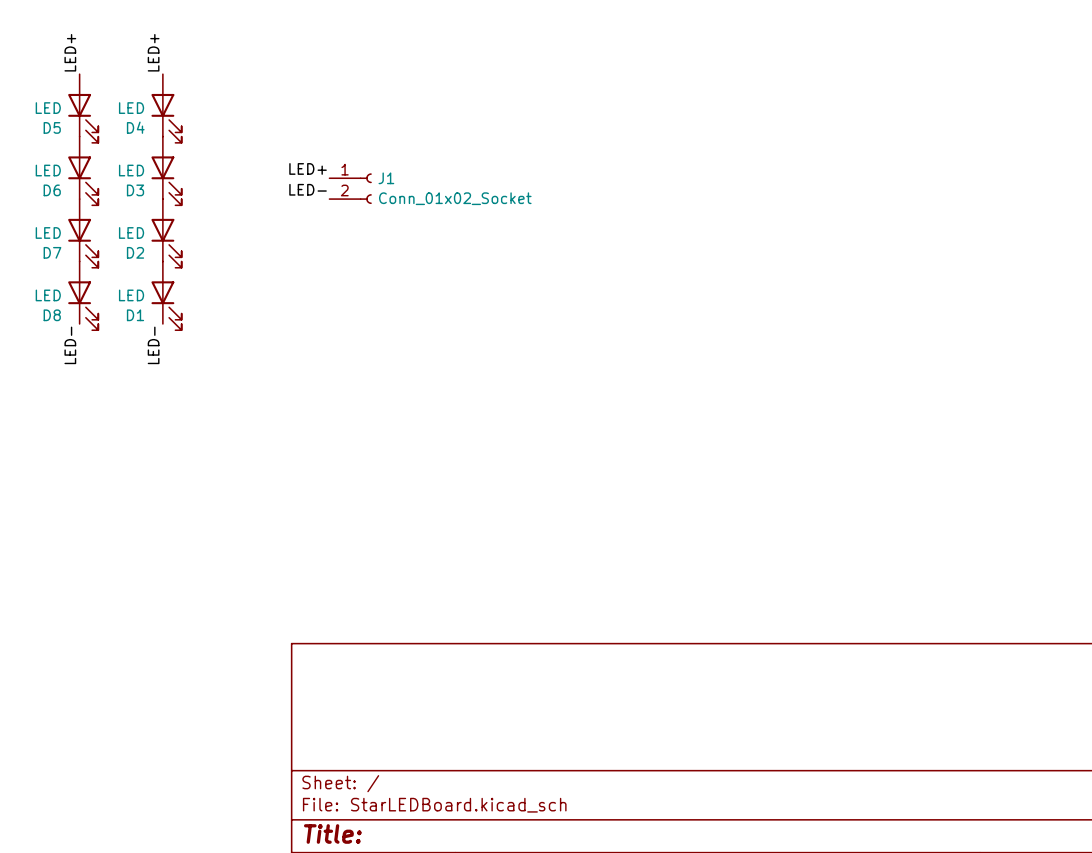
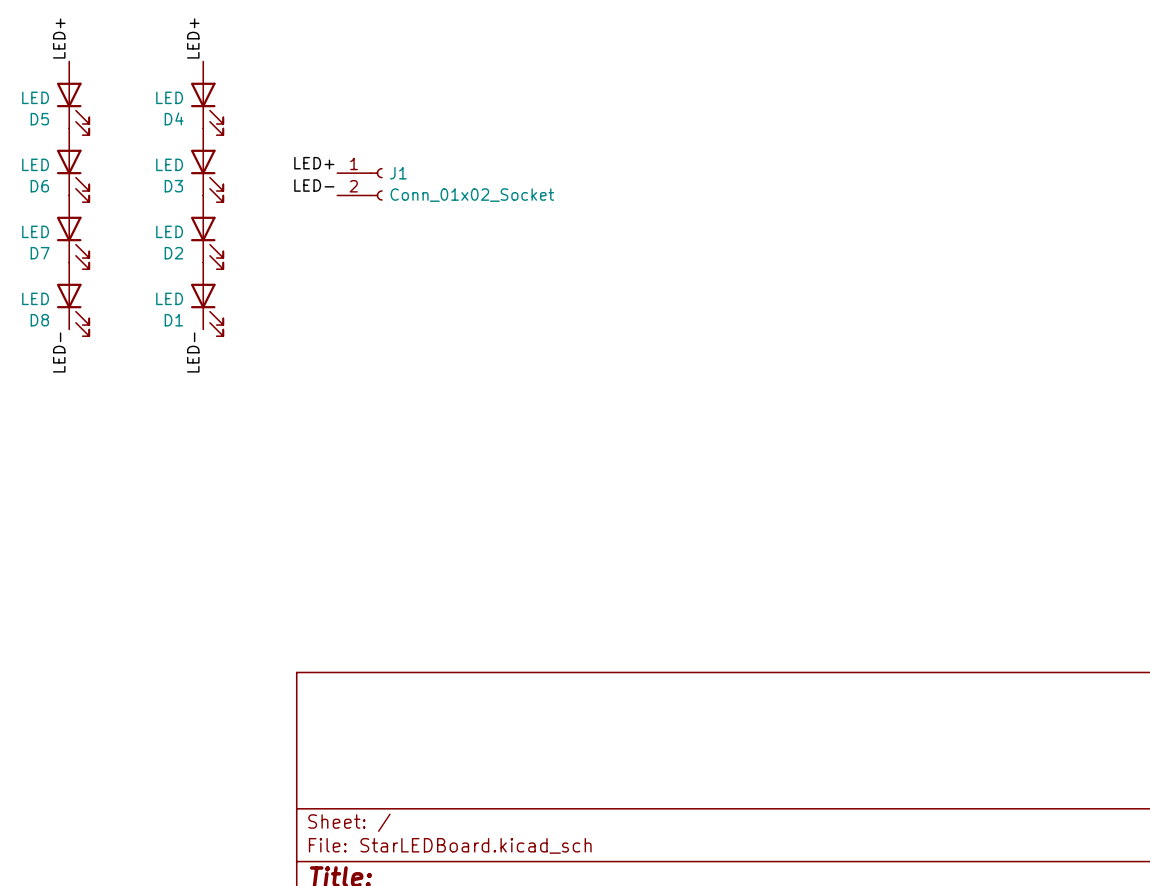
label position: LED+ (153, 52) -> LED+ (193, 38)
D4 position: (166, 108) -> (207, 98)
D3 position: (166, 170) -> (207, 165)
D2 position: (166, 233) -> (207, 232)
D1 position: (166, 295) -> (207, 299)
label position: LED- (153, 345) -> LED- (193, 352)

